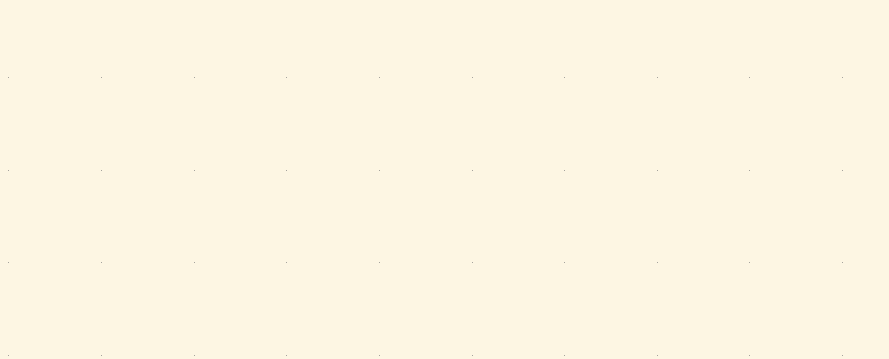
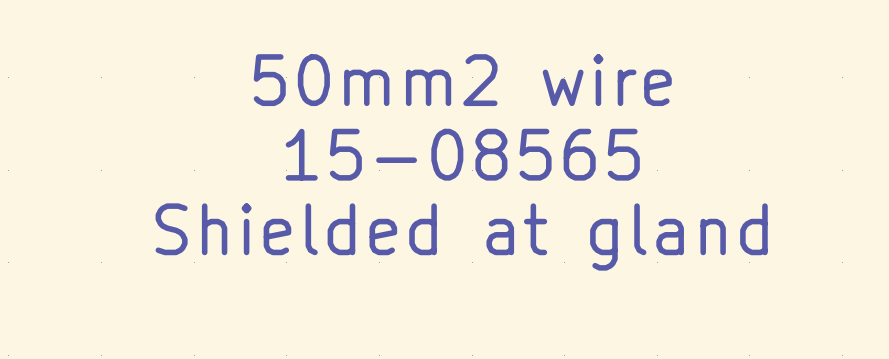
text: none -> 50mm2 wire (462, 80)
text: none -> 15-08565 (462, 154)
text: none -> Shielded at gland (461, 237)

